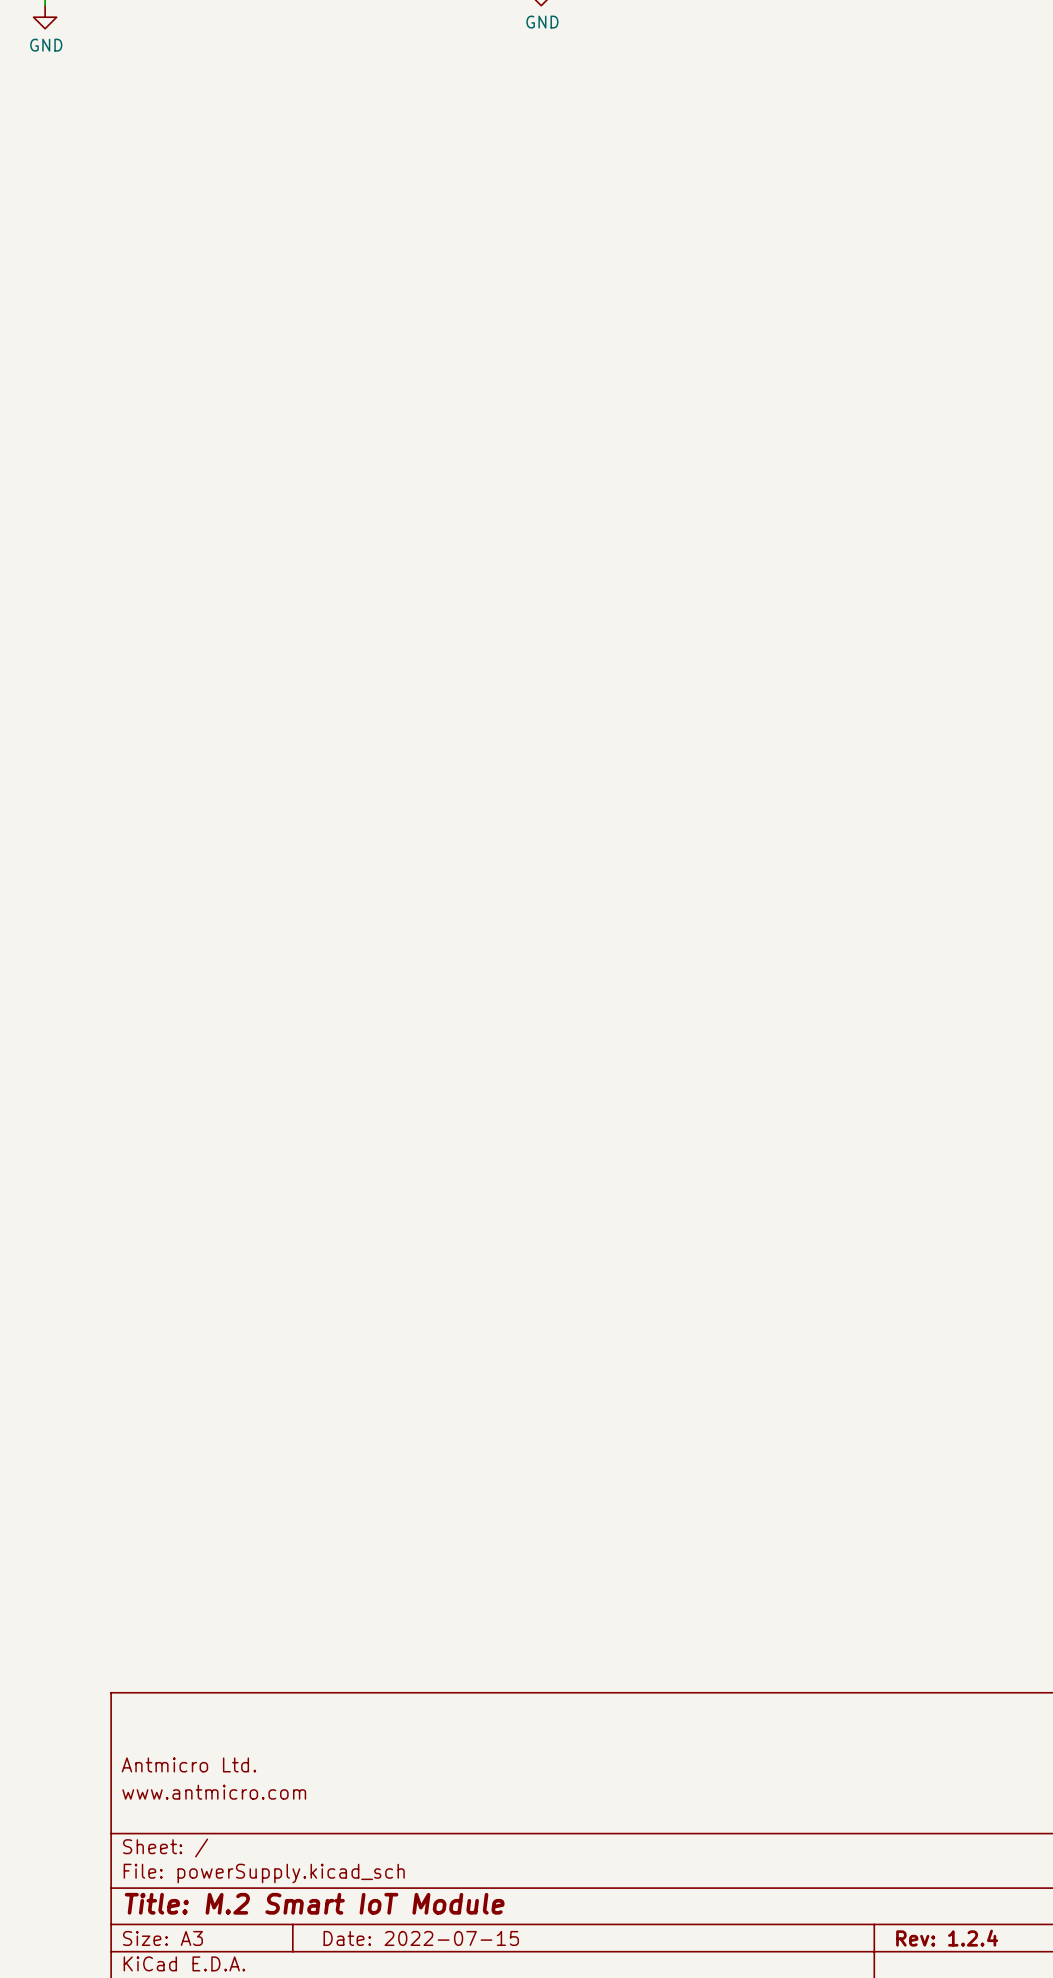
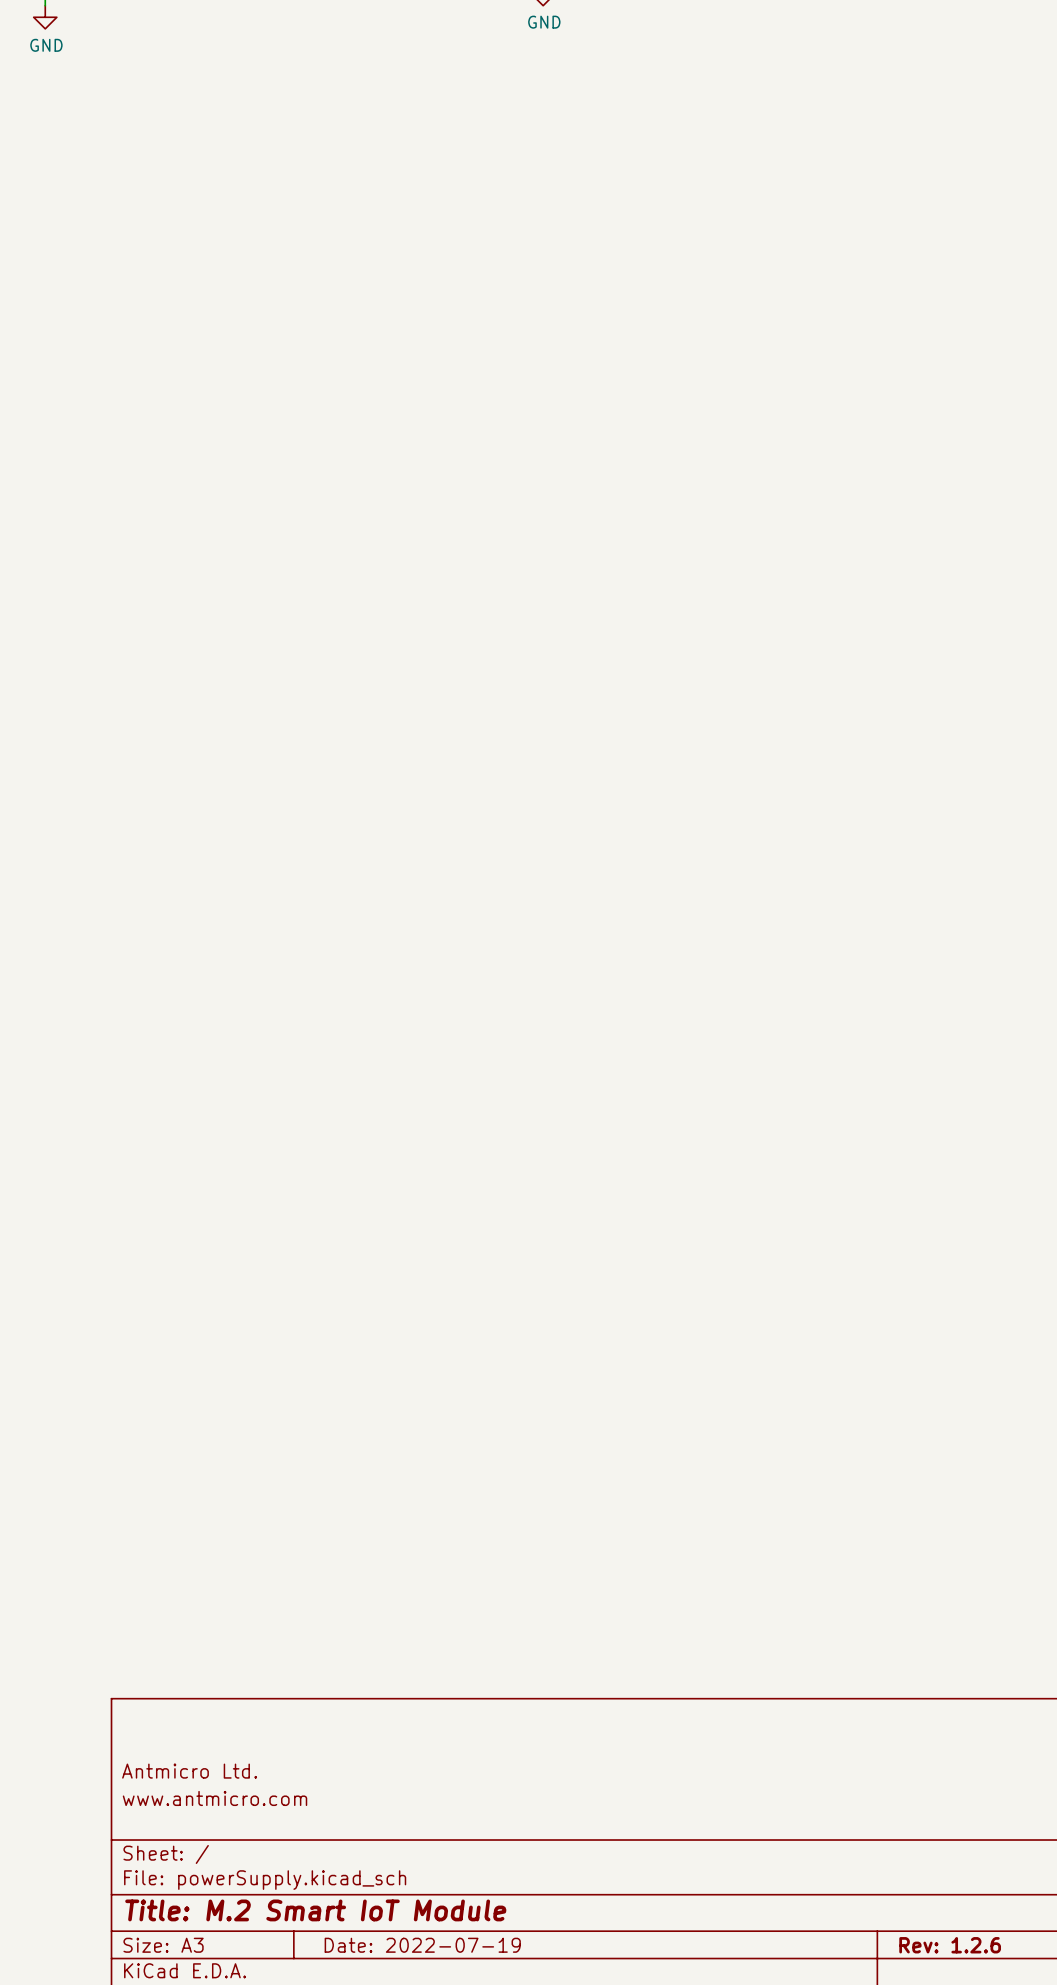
title block: Date: 2022-07-15 (421, 1938) -> Date: 2022-07-19 (422, 1945)
title block: Rev: 1.2.4 (947, 1938) -> Rev: 1.2.6 (950, 1945)

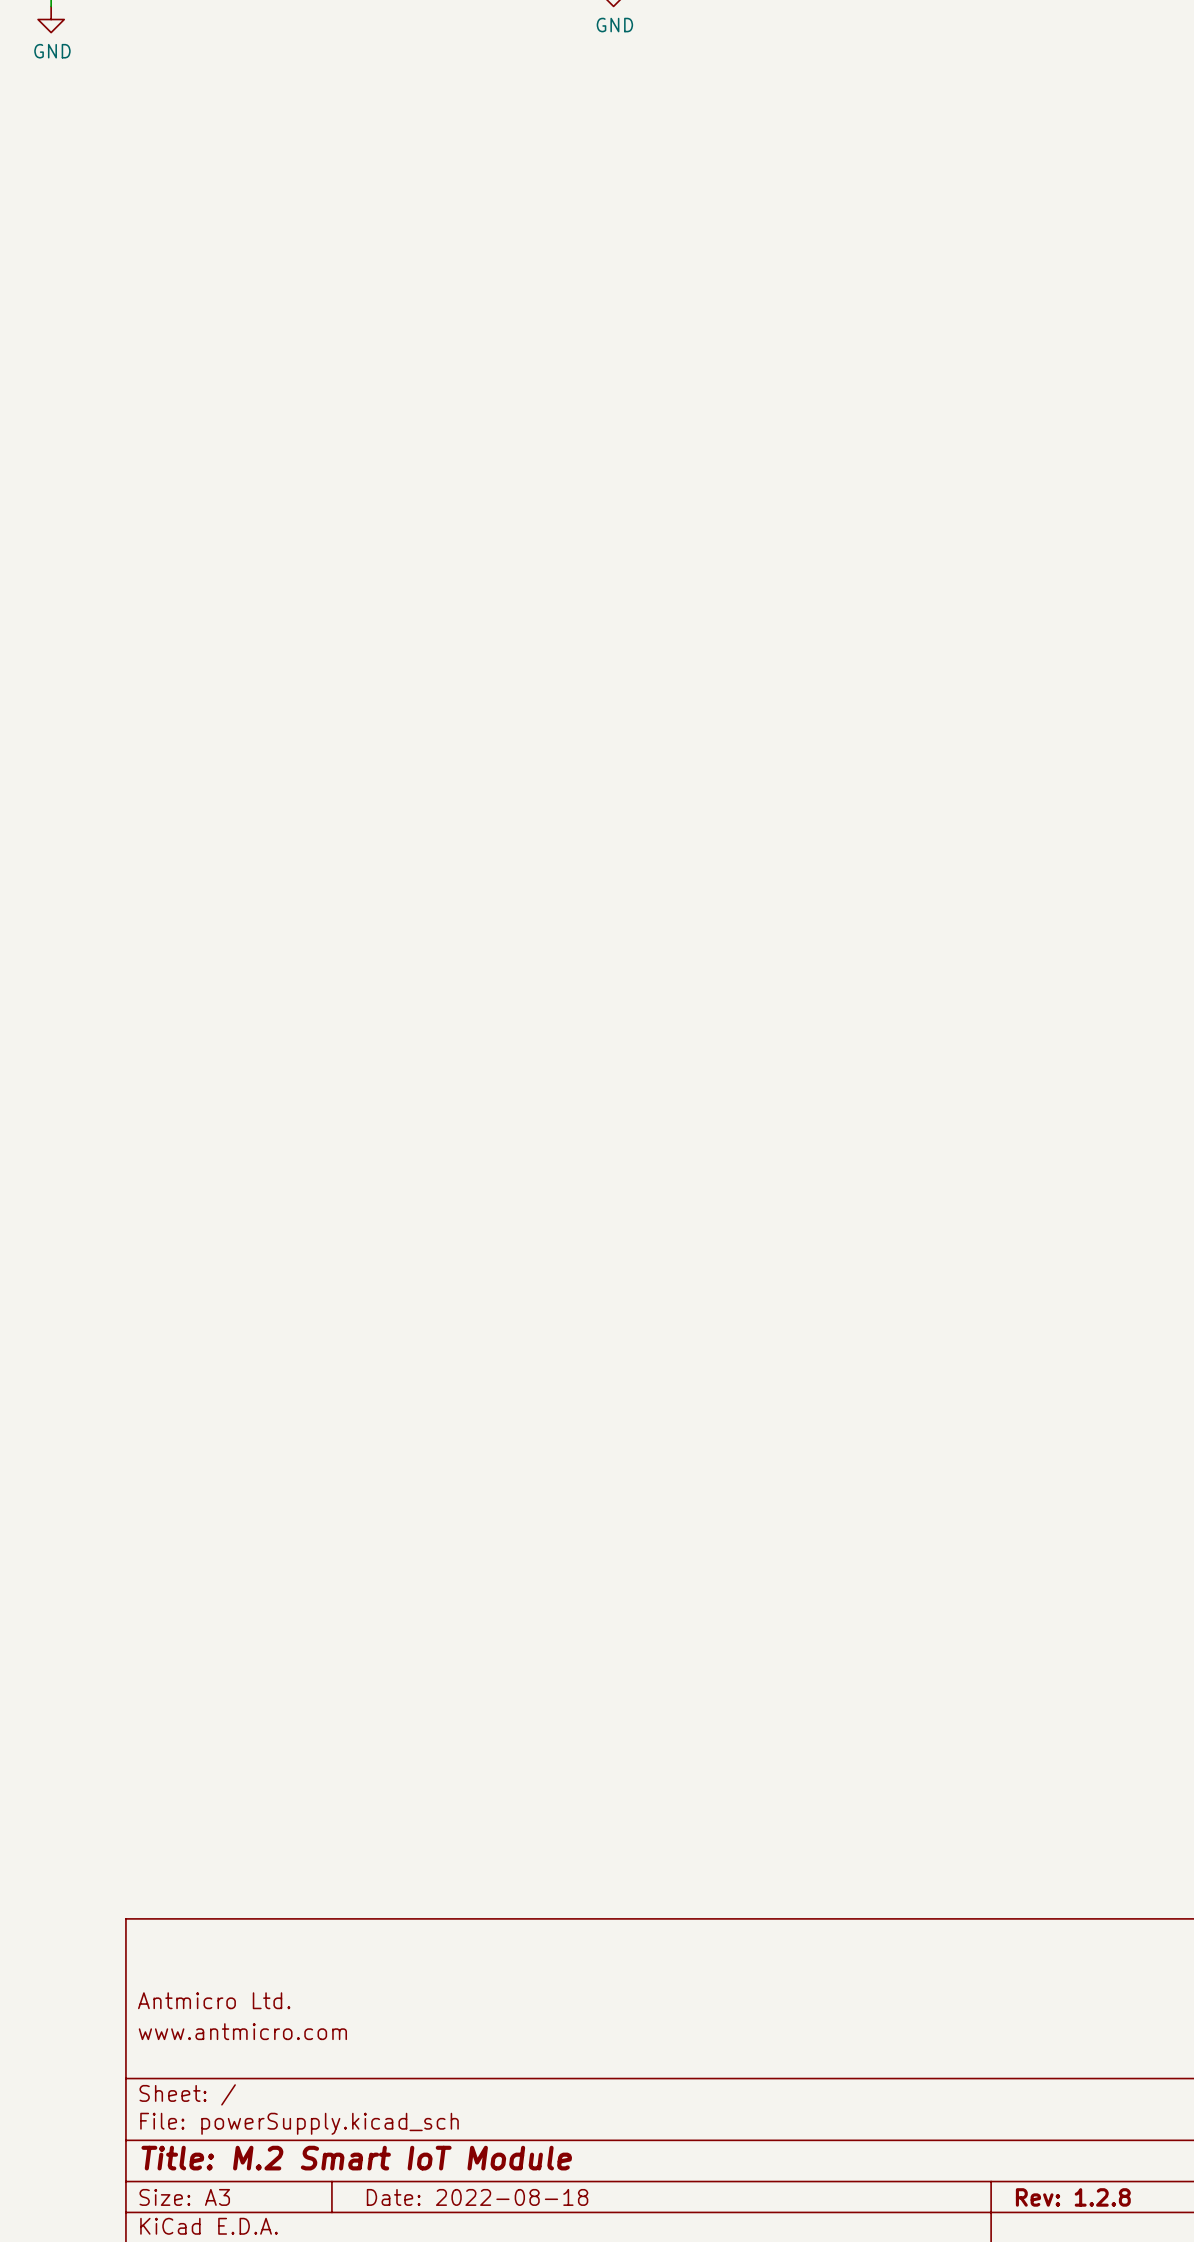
title block: Date: 2022-07-19 (422, 1945) -> Date: 2022-08-18 (477, 2197)
title block: Rev: 1.2.6 (950, 1945) -> Rev: 1.2.8 (1073, 2197)

